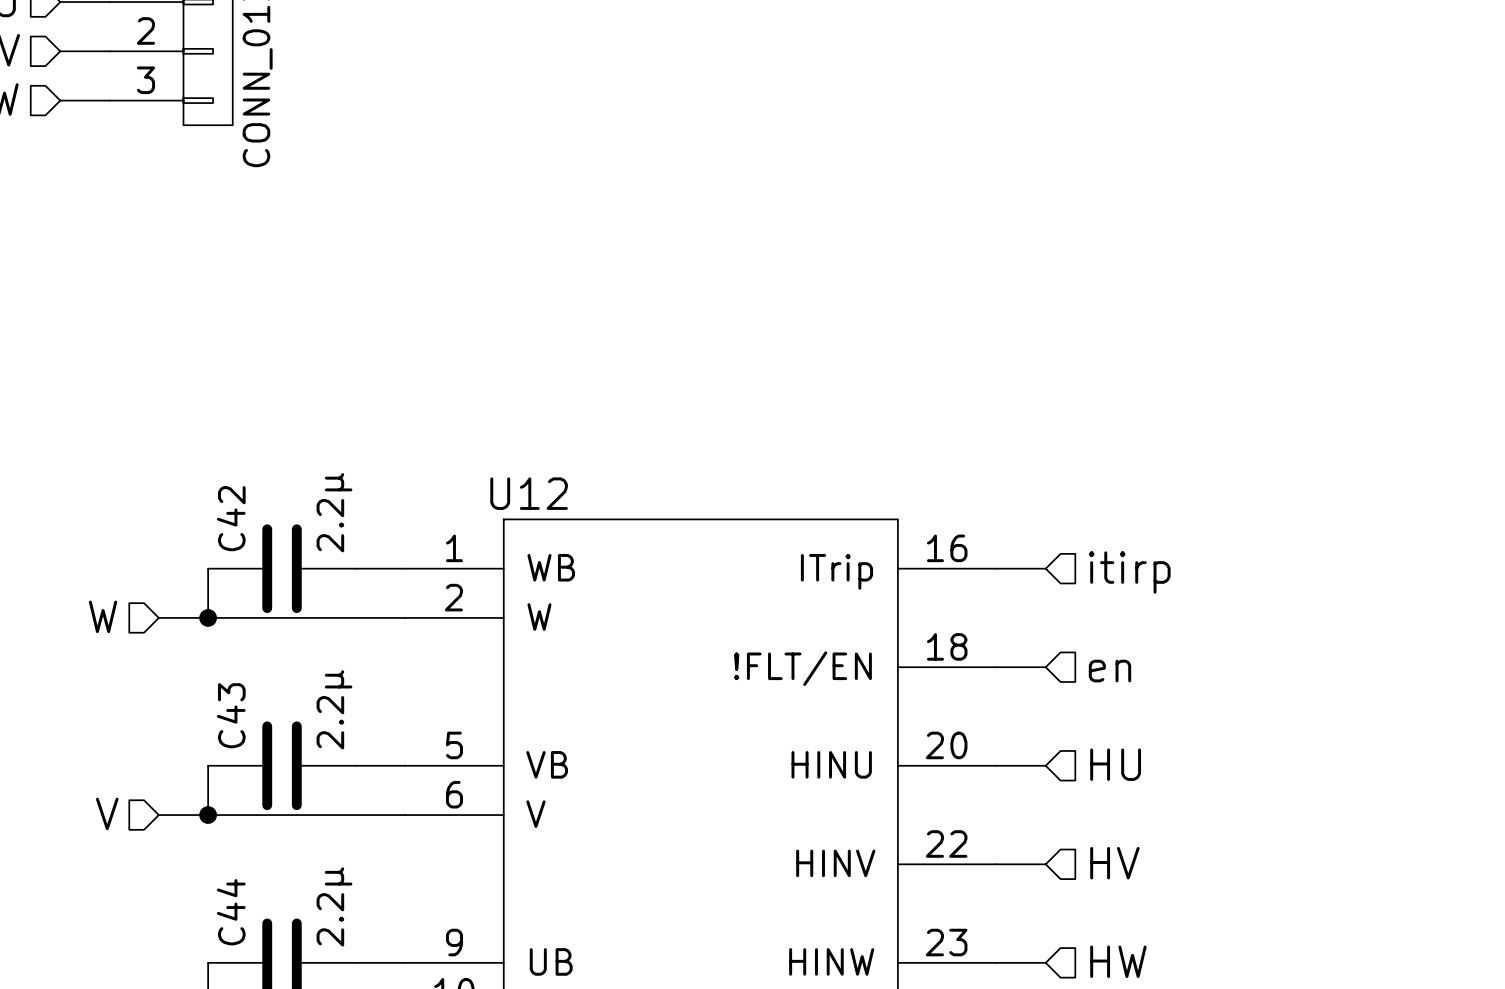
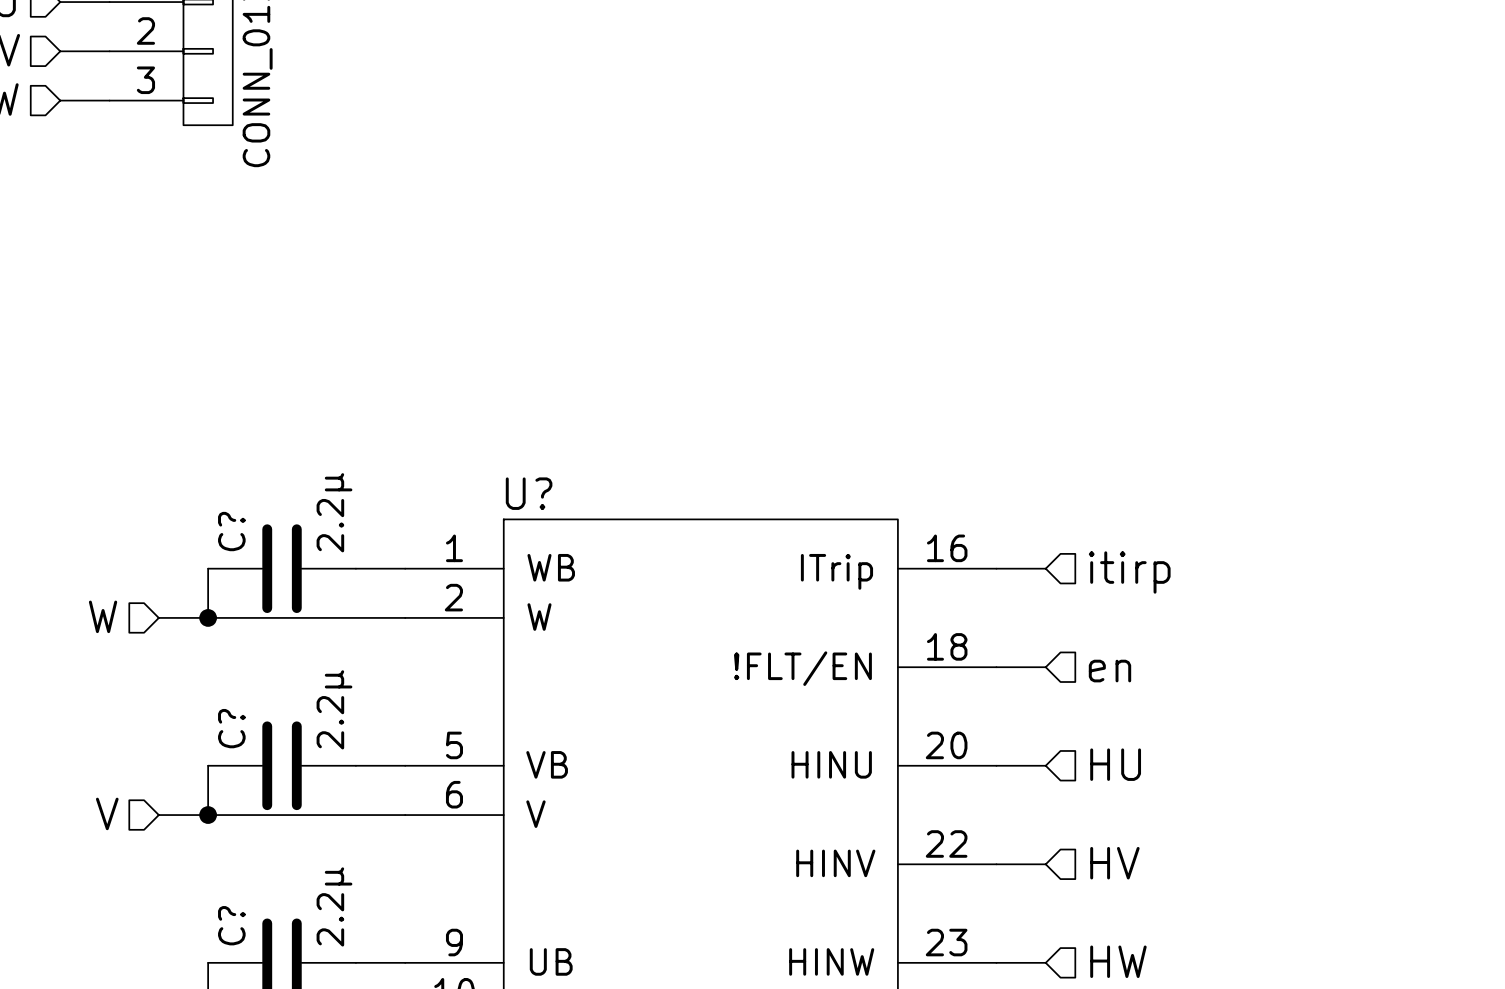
U12 name: U12 (529, 493) -> U? (529, 493)
C42 name: C42 (231, 518) -> C? (231, 531)
C43 name: C43 (231, 715) -> C? (231, 728)
C44 name: C44 (231, 912) -> C? (231, 925)

